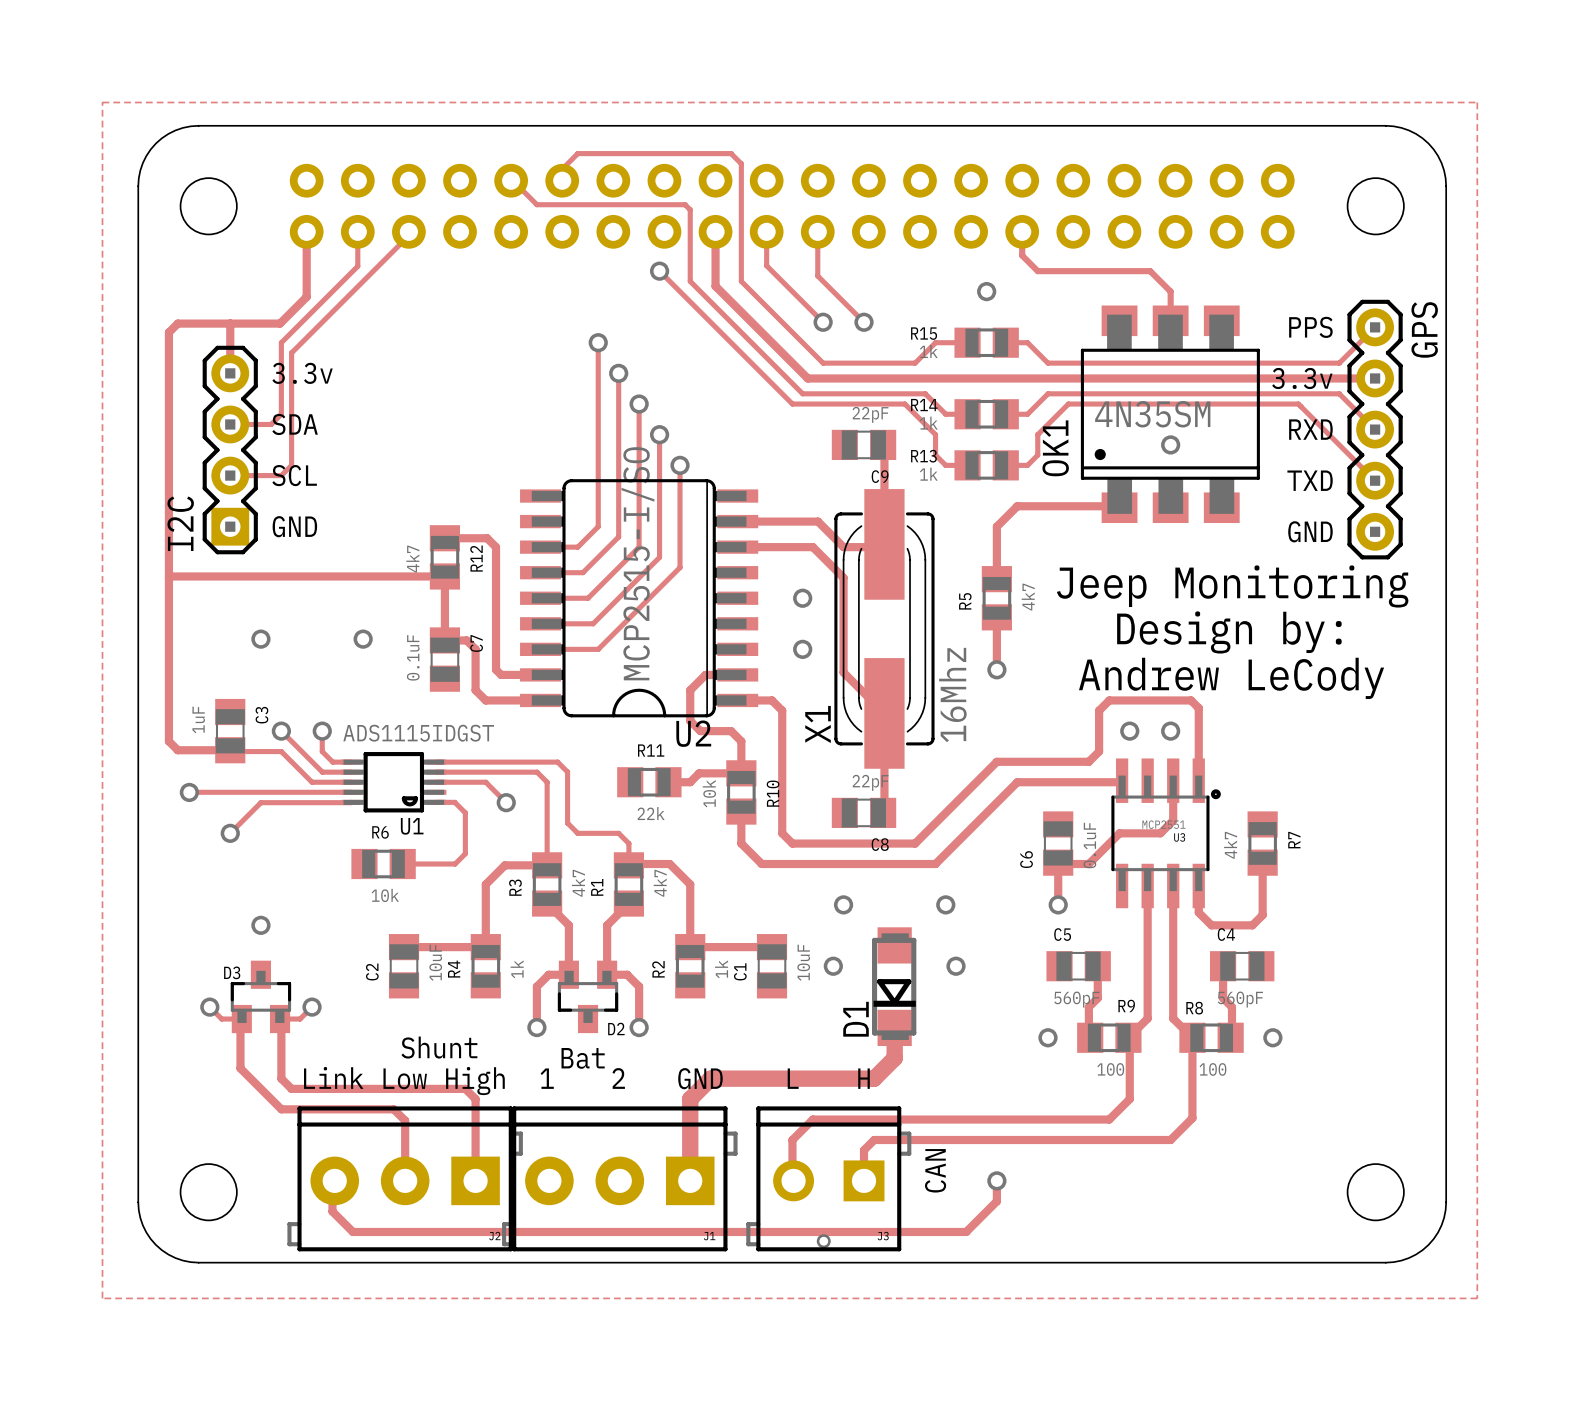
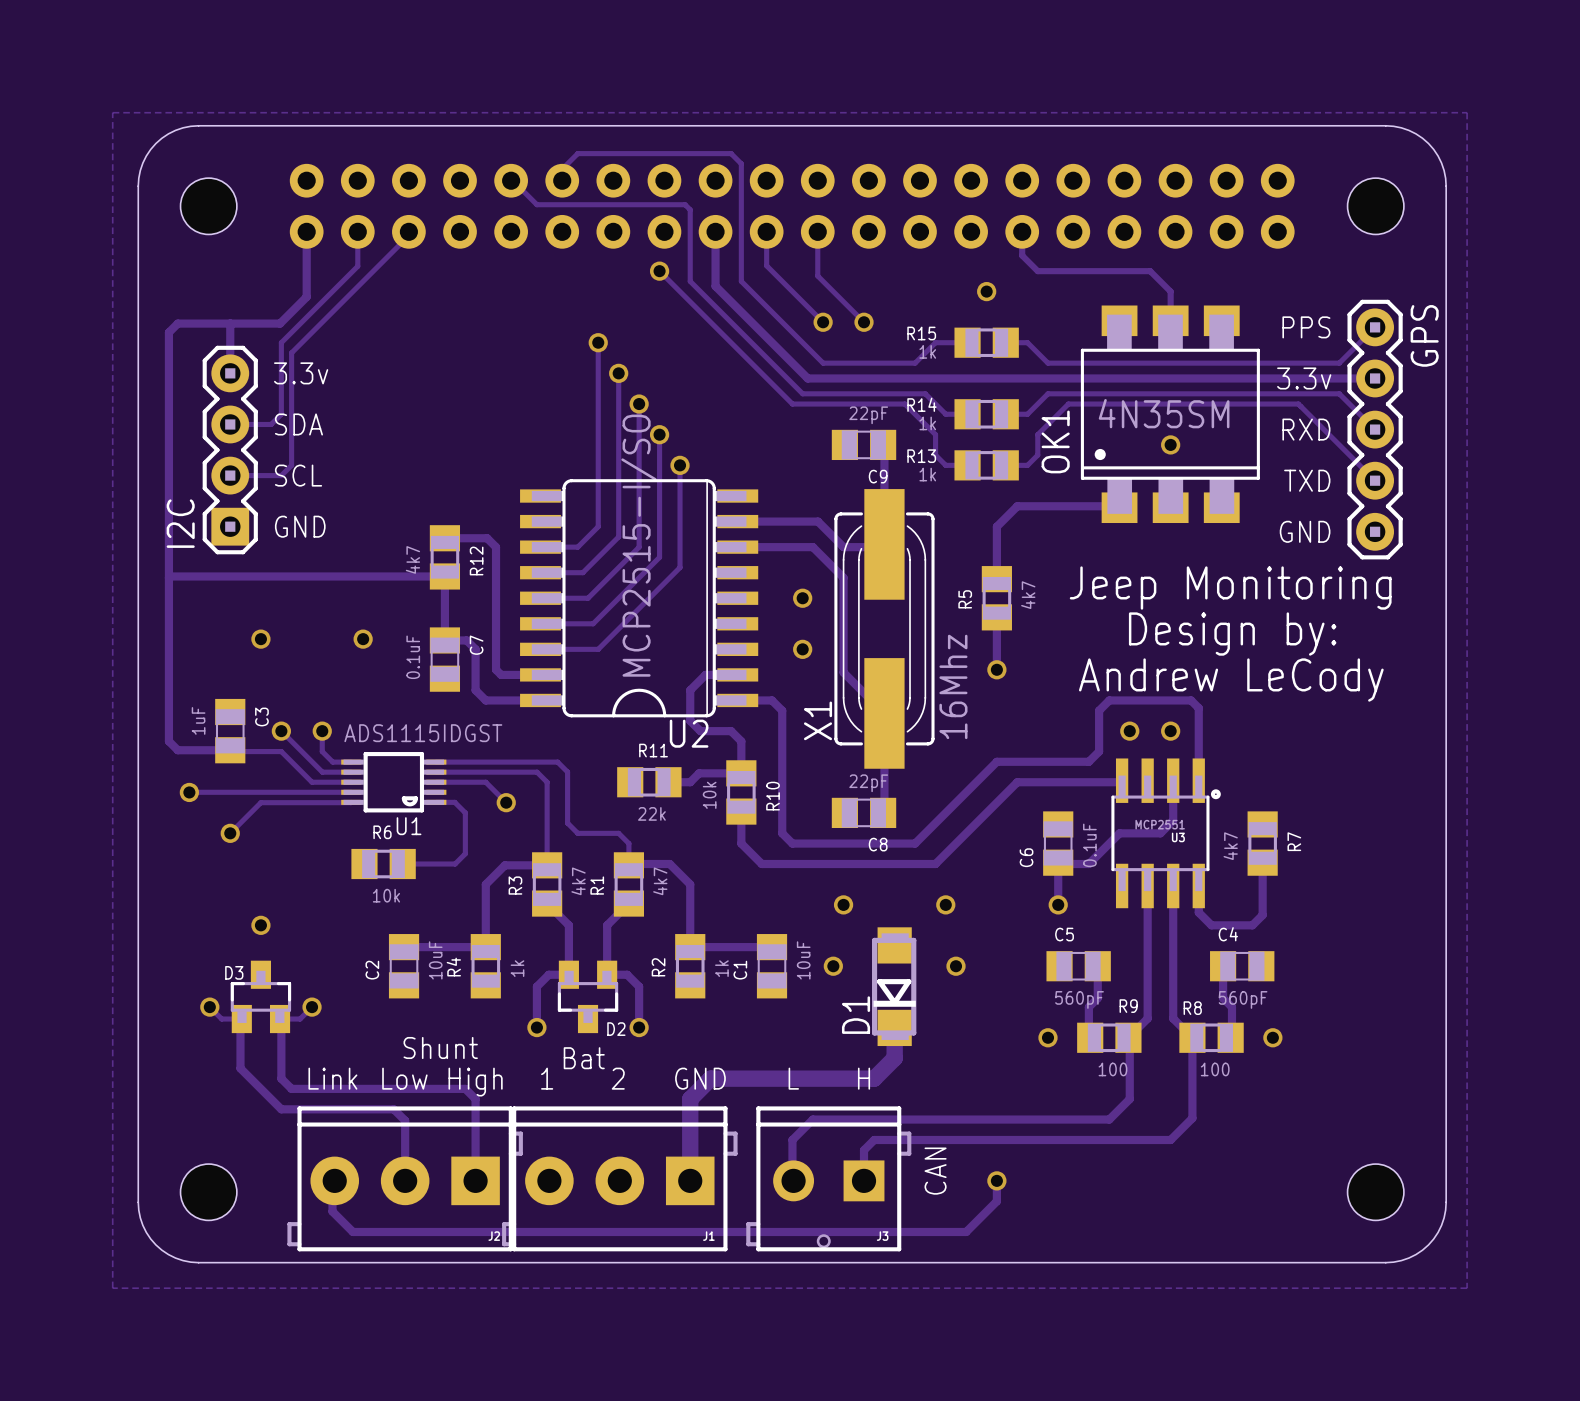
zone outline: (102, 102) (1477, 102) (1477, 1298) (102, 1298) (102, 102) -> (112, 112) (112, 1288) (1467, 1288) (1467, 112) (112, 112)

